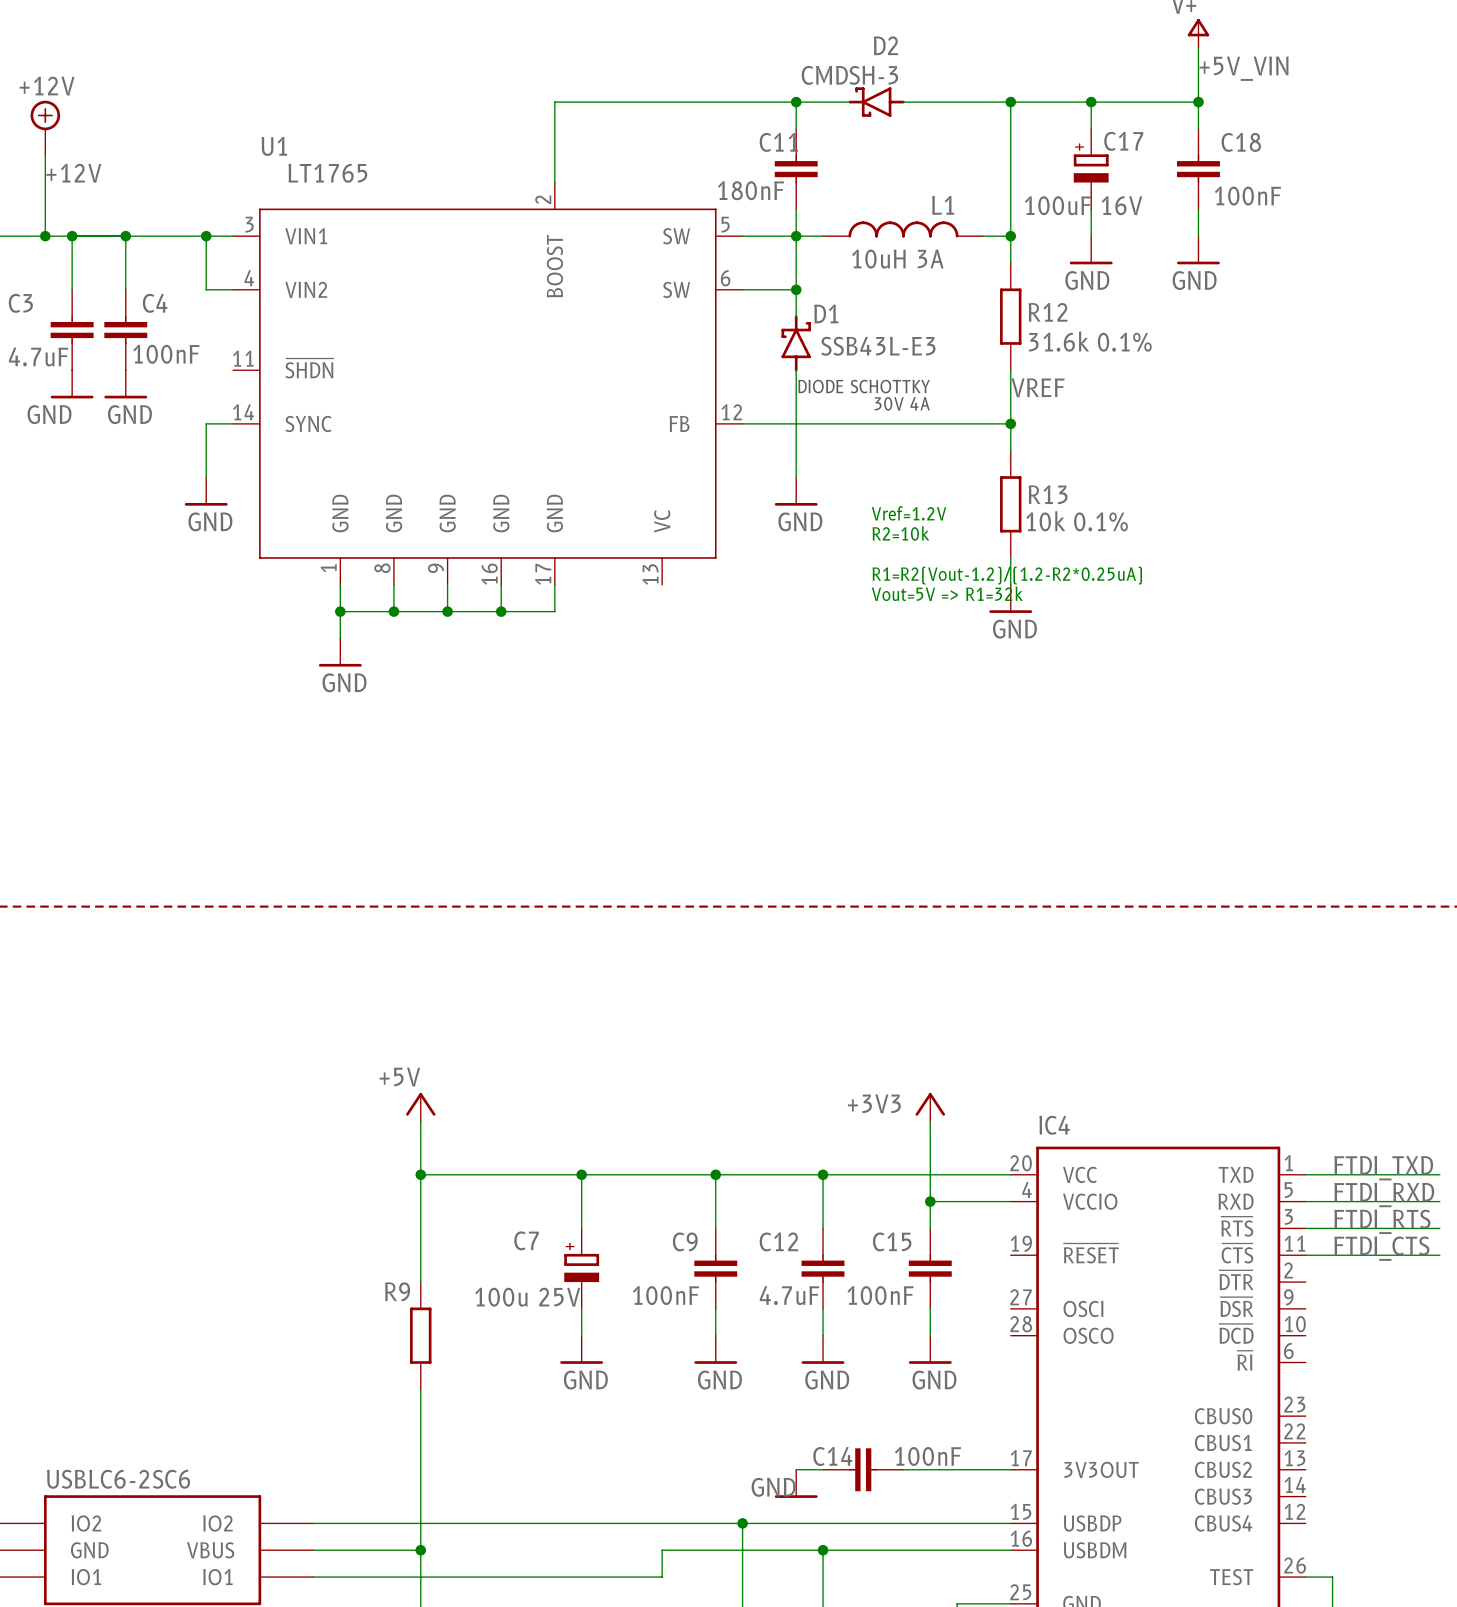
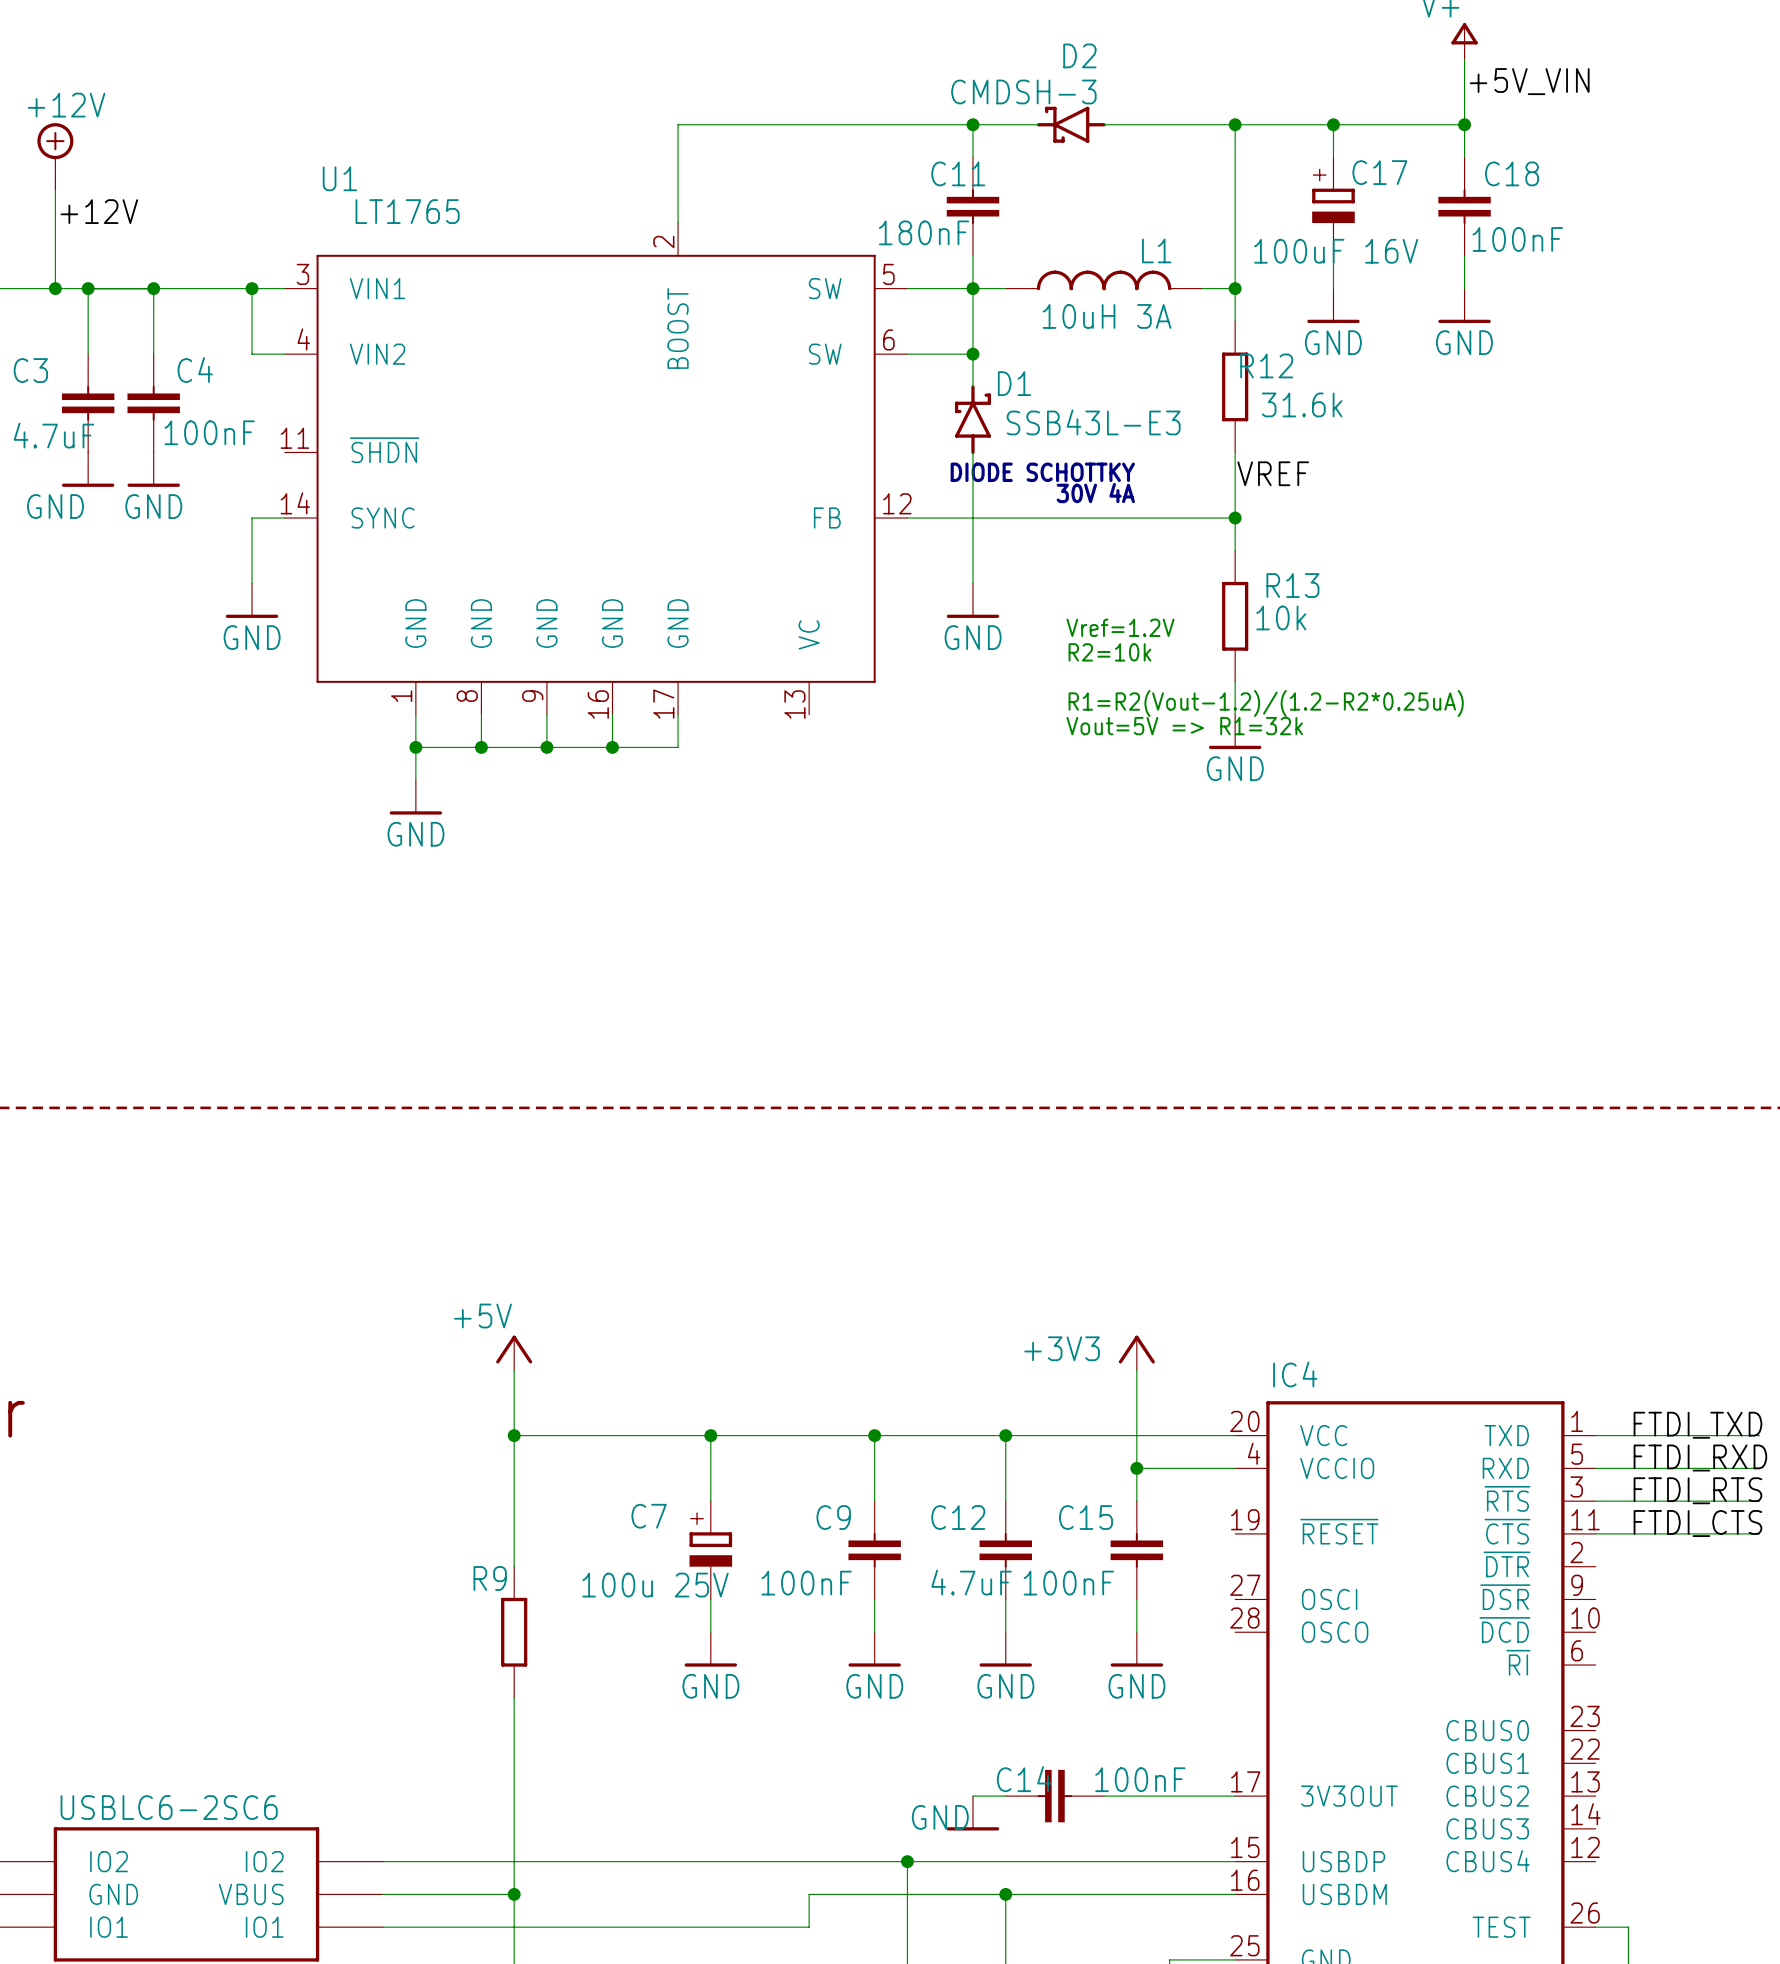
R12 name position: R12 (1048, 312) -> R12 (1266, 365)
R12 value: 31.6k 0.1% (1090, 341) -> 31.6k (1302, 404)
R13 name position: R13 (1048, 494) -> R13 (1292, 585)
R13 value: 10k 0.1% (1077, 521) -> 10k (1281, 617)

